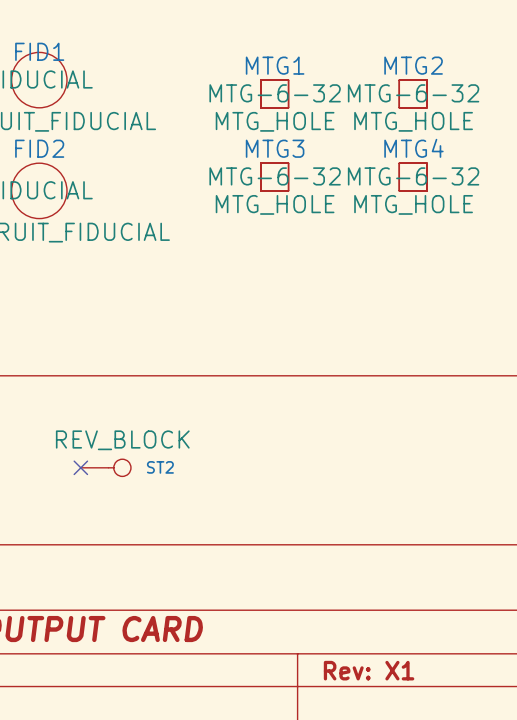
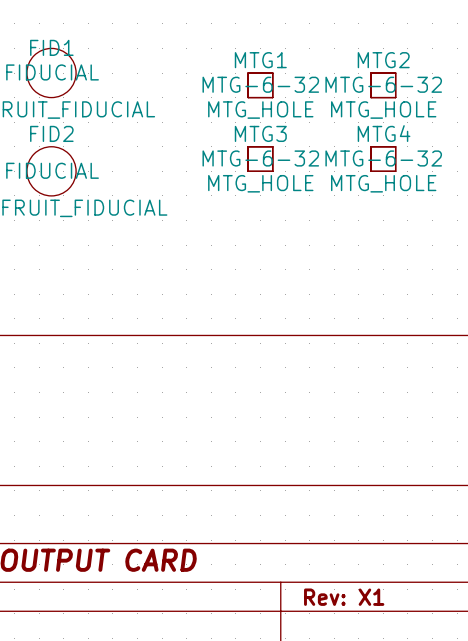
no-connect mark: (80, 467) -> none
ST2: (105, 467) -> none

